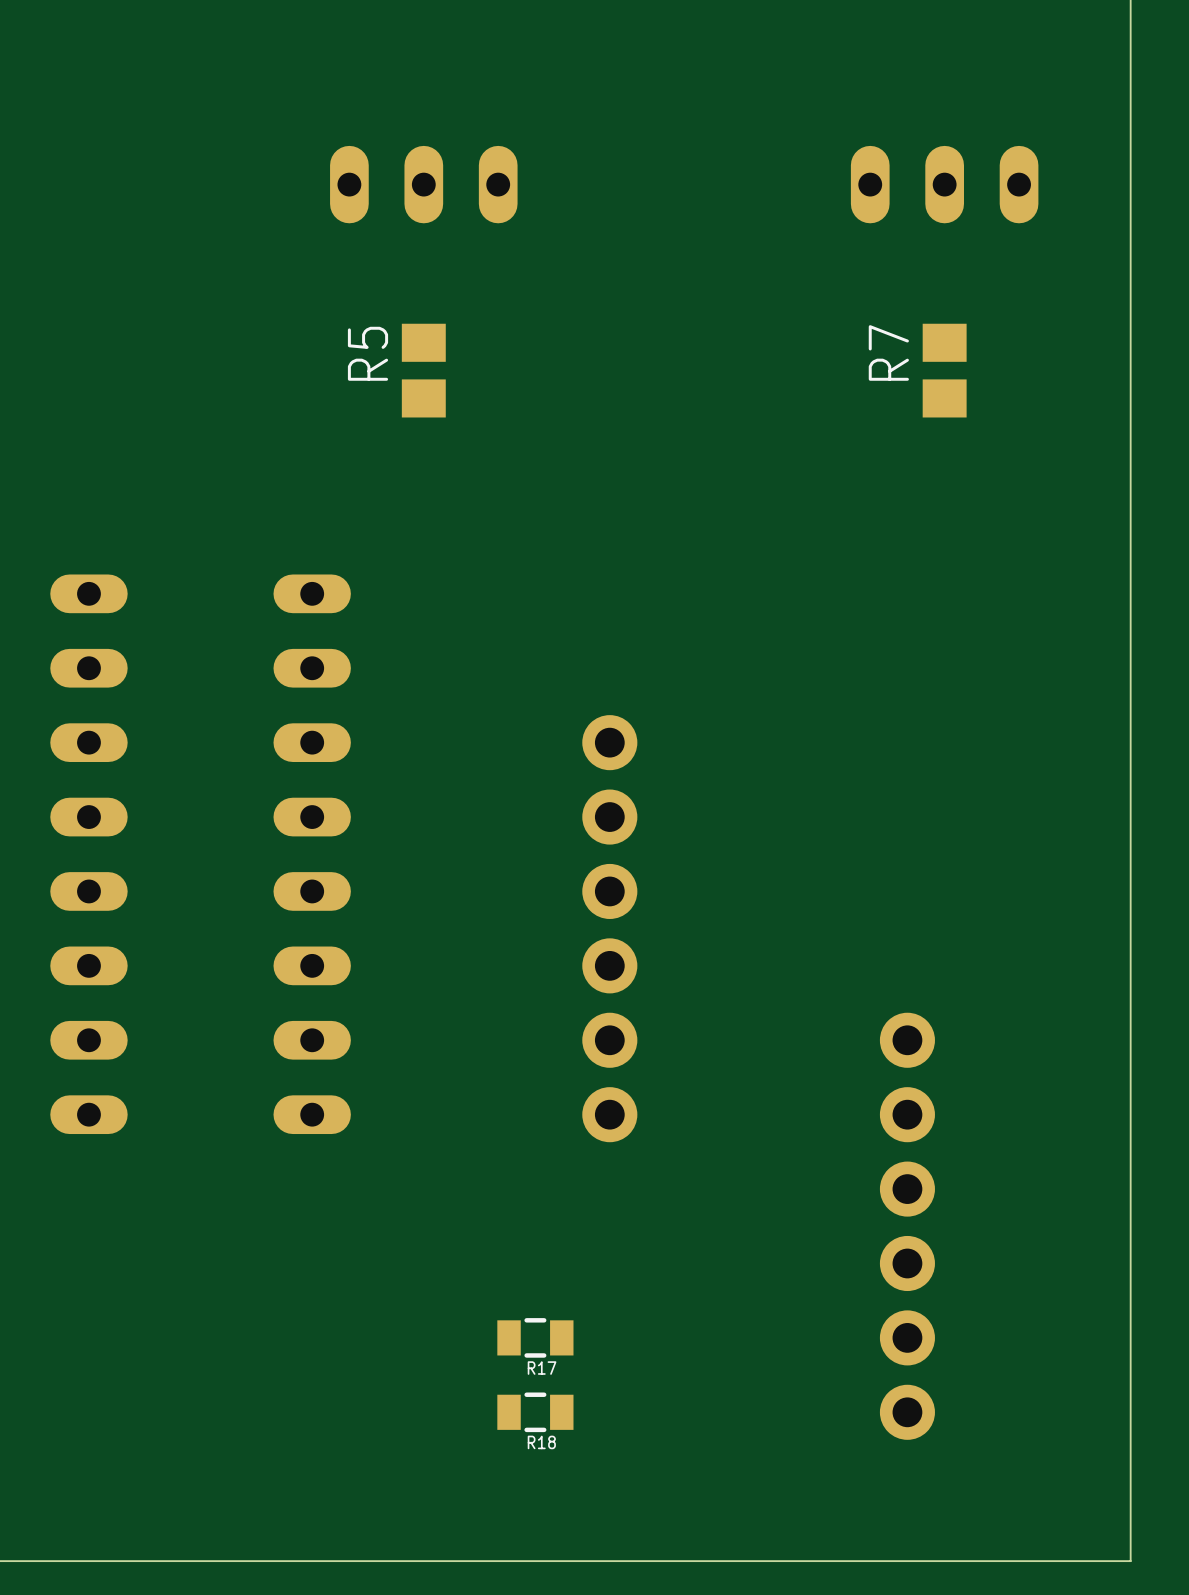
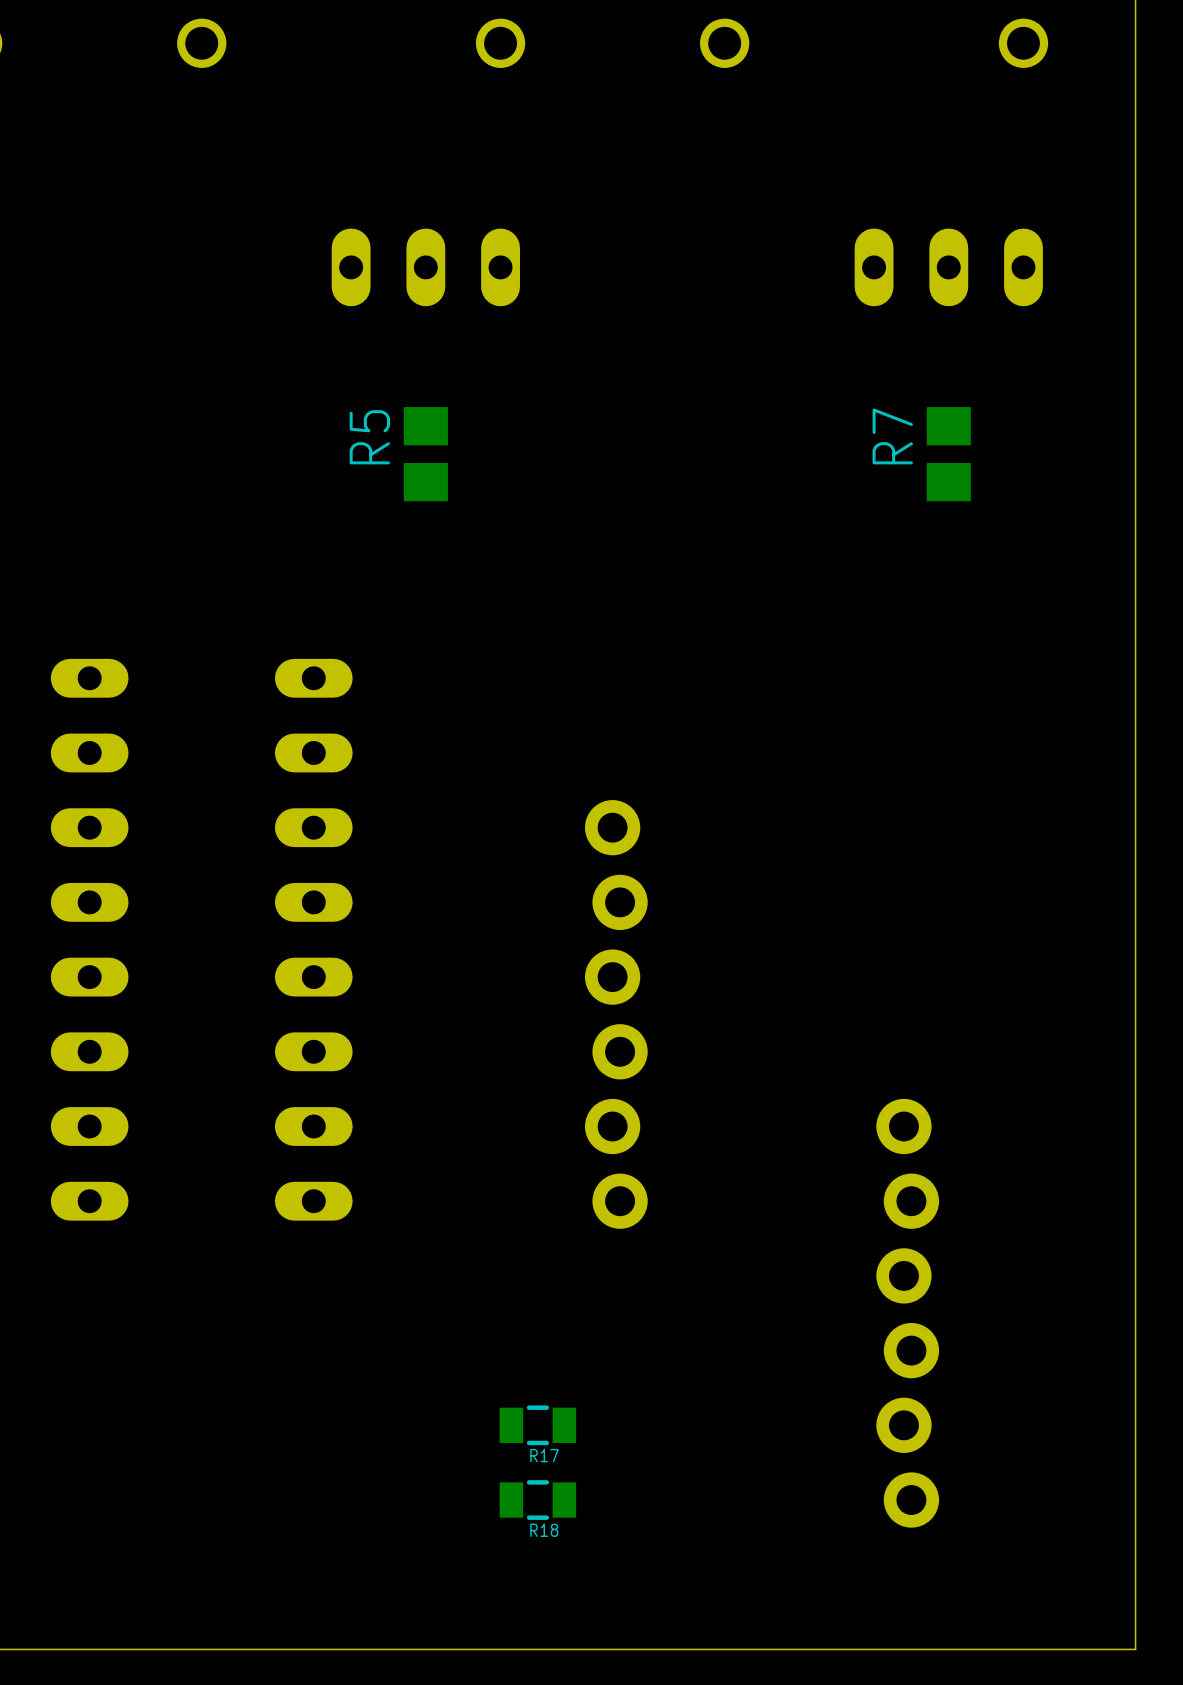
part footprint: [582, 715, 638, 1143] -> [584, 800, 648, 1229]
part footprint: [879, 1012, 935, 1440] -> [876, 1098, 940, 1528]

